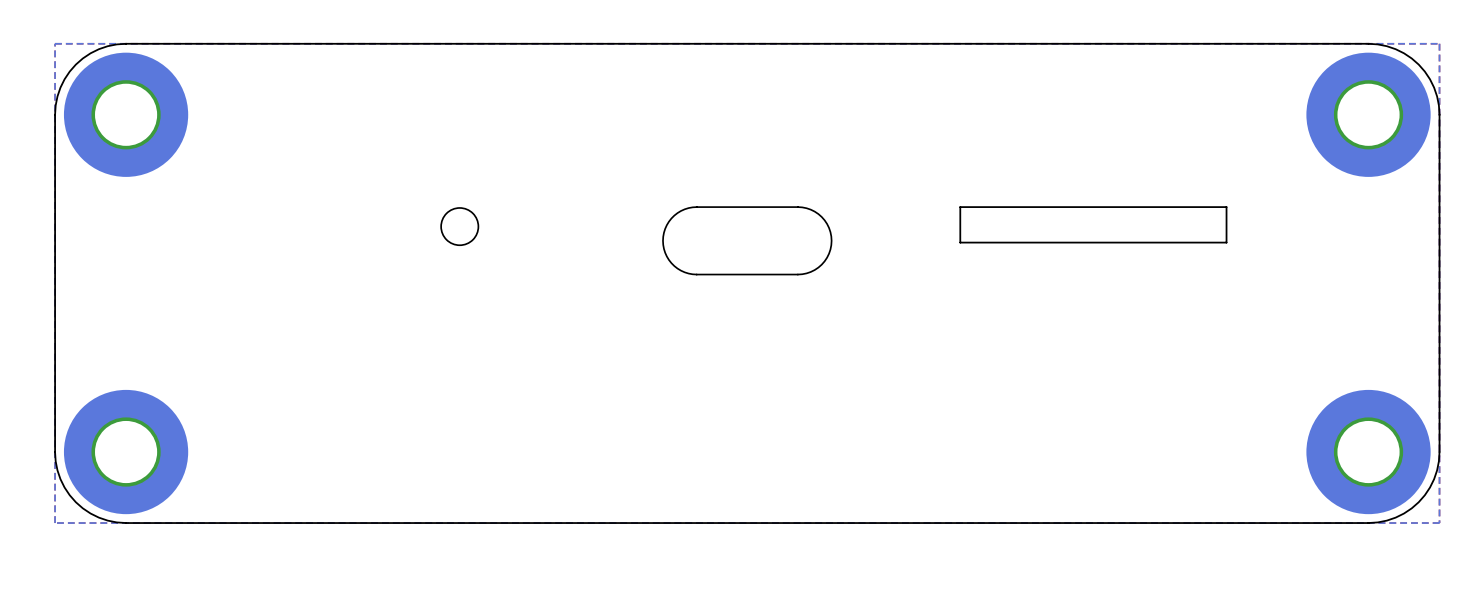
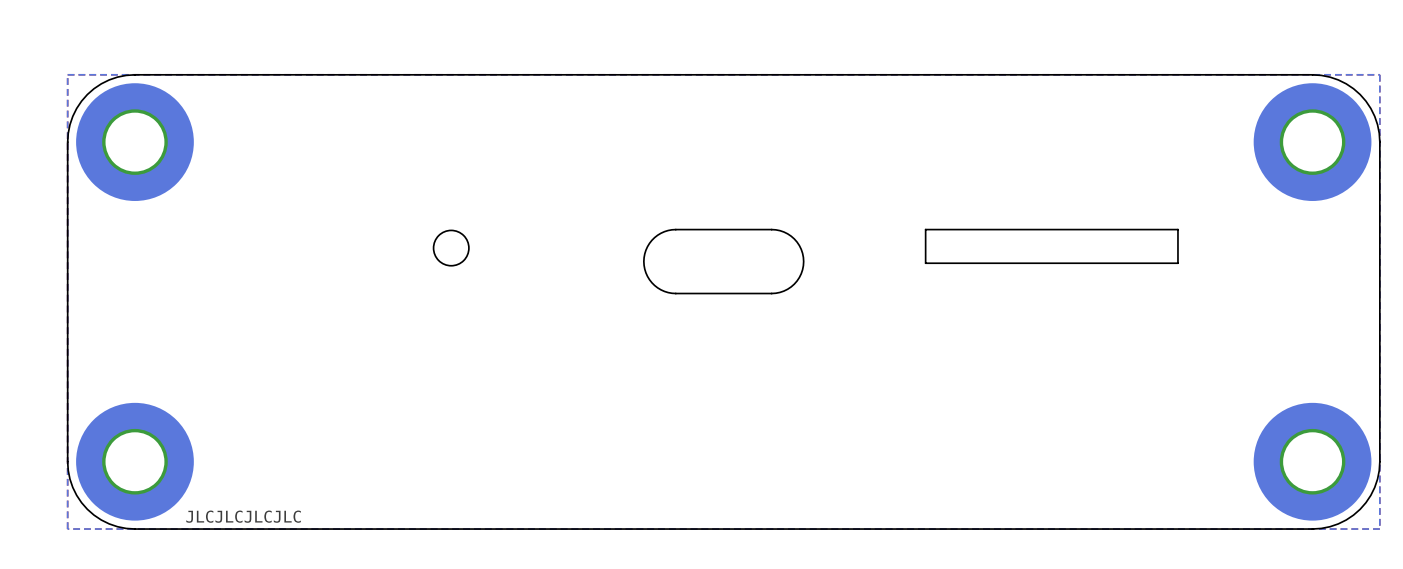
text: none -> JLCJLCJLCJLC (243, 516)

